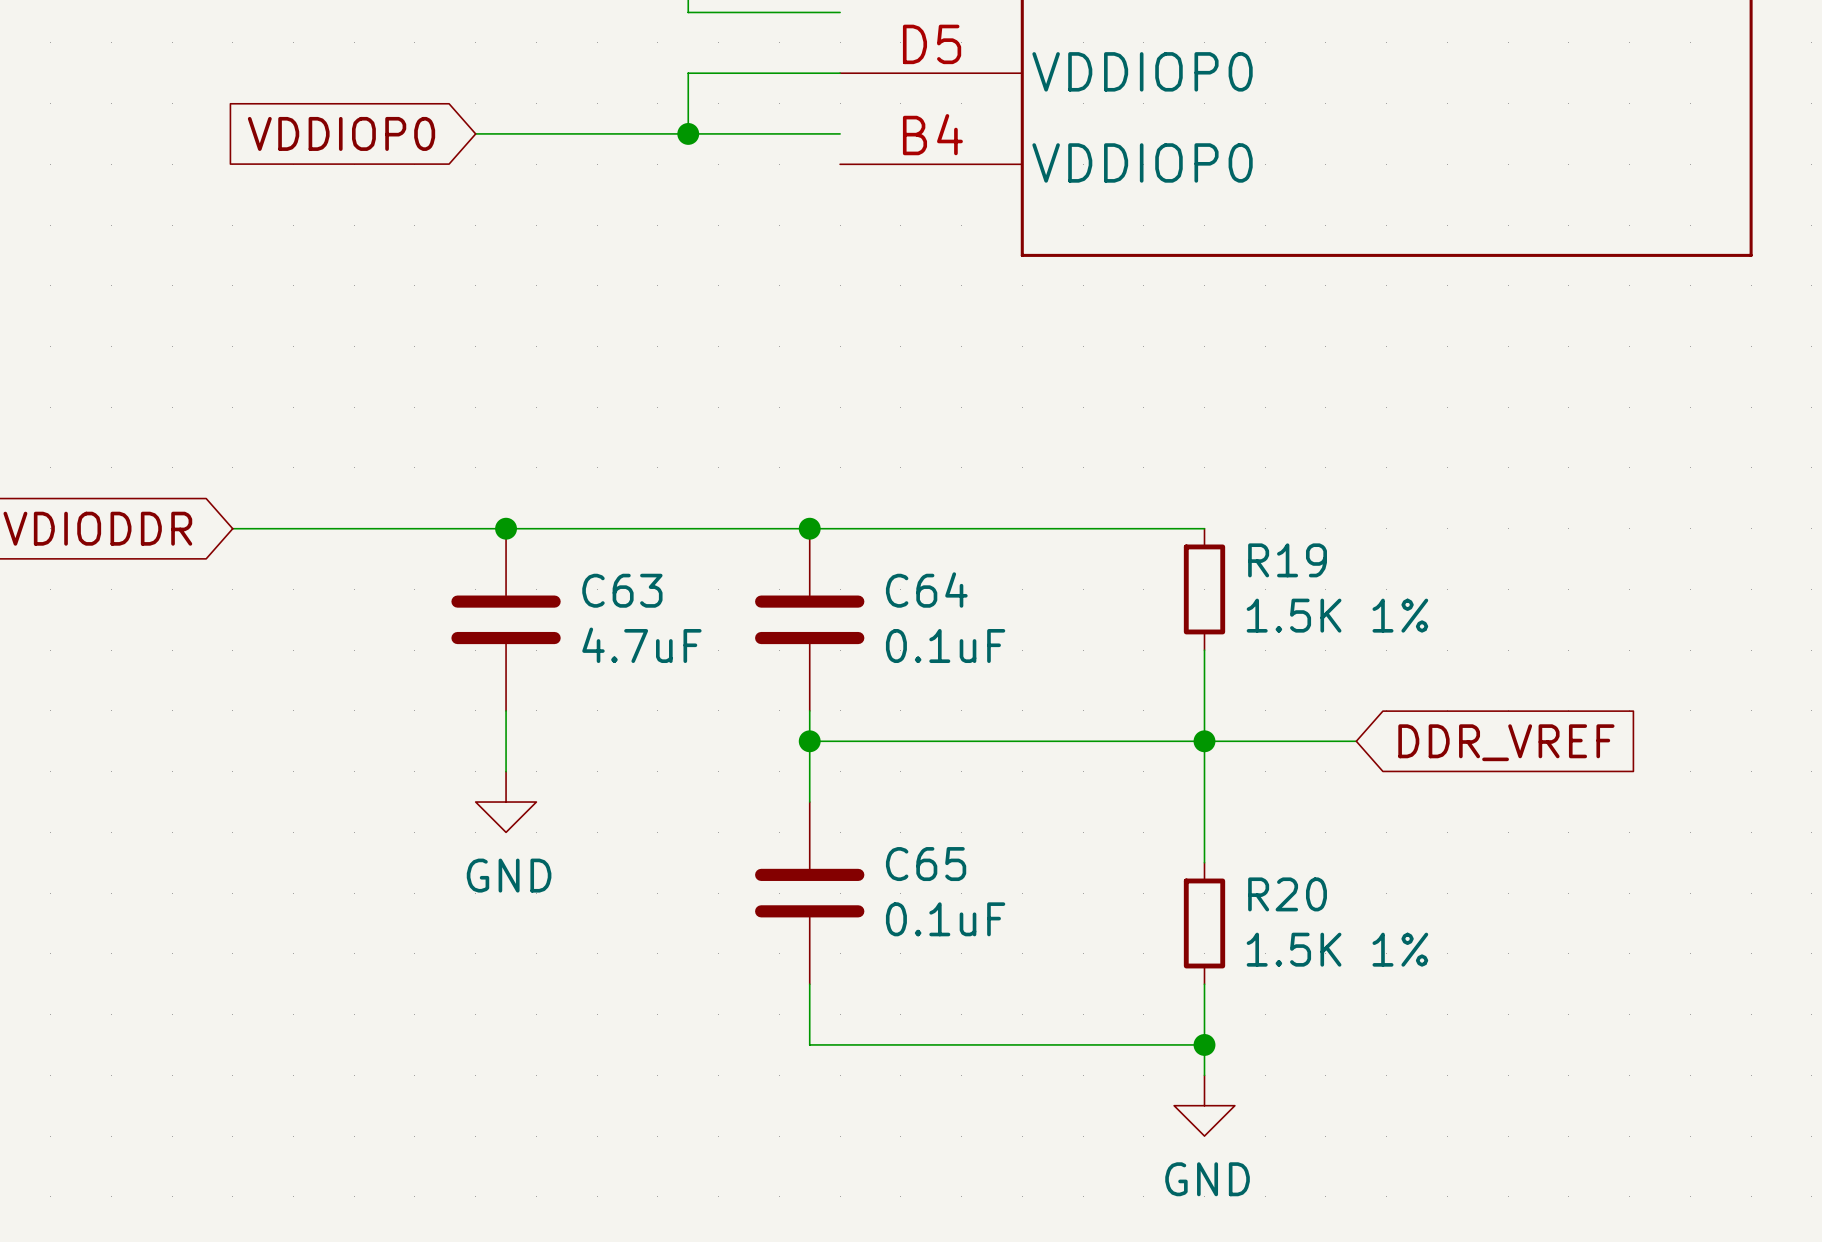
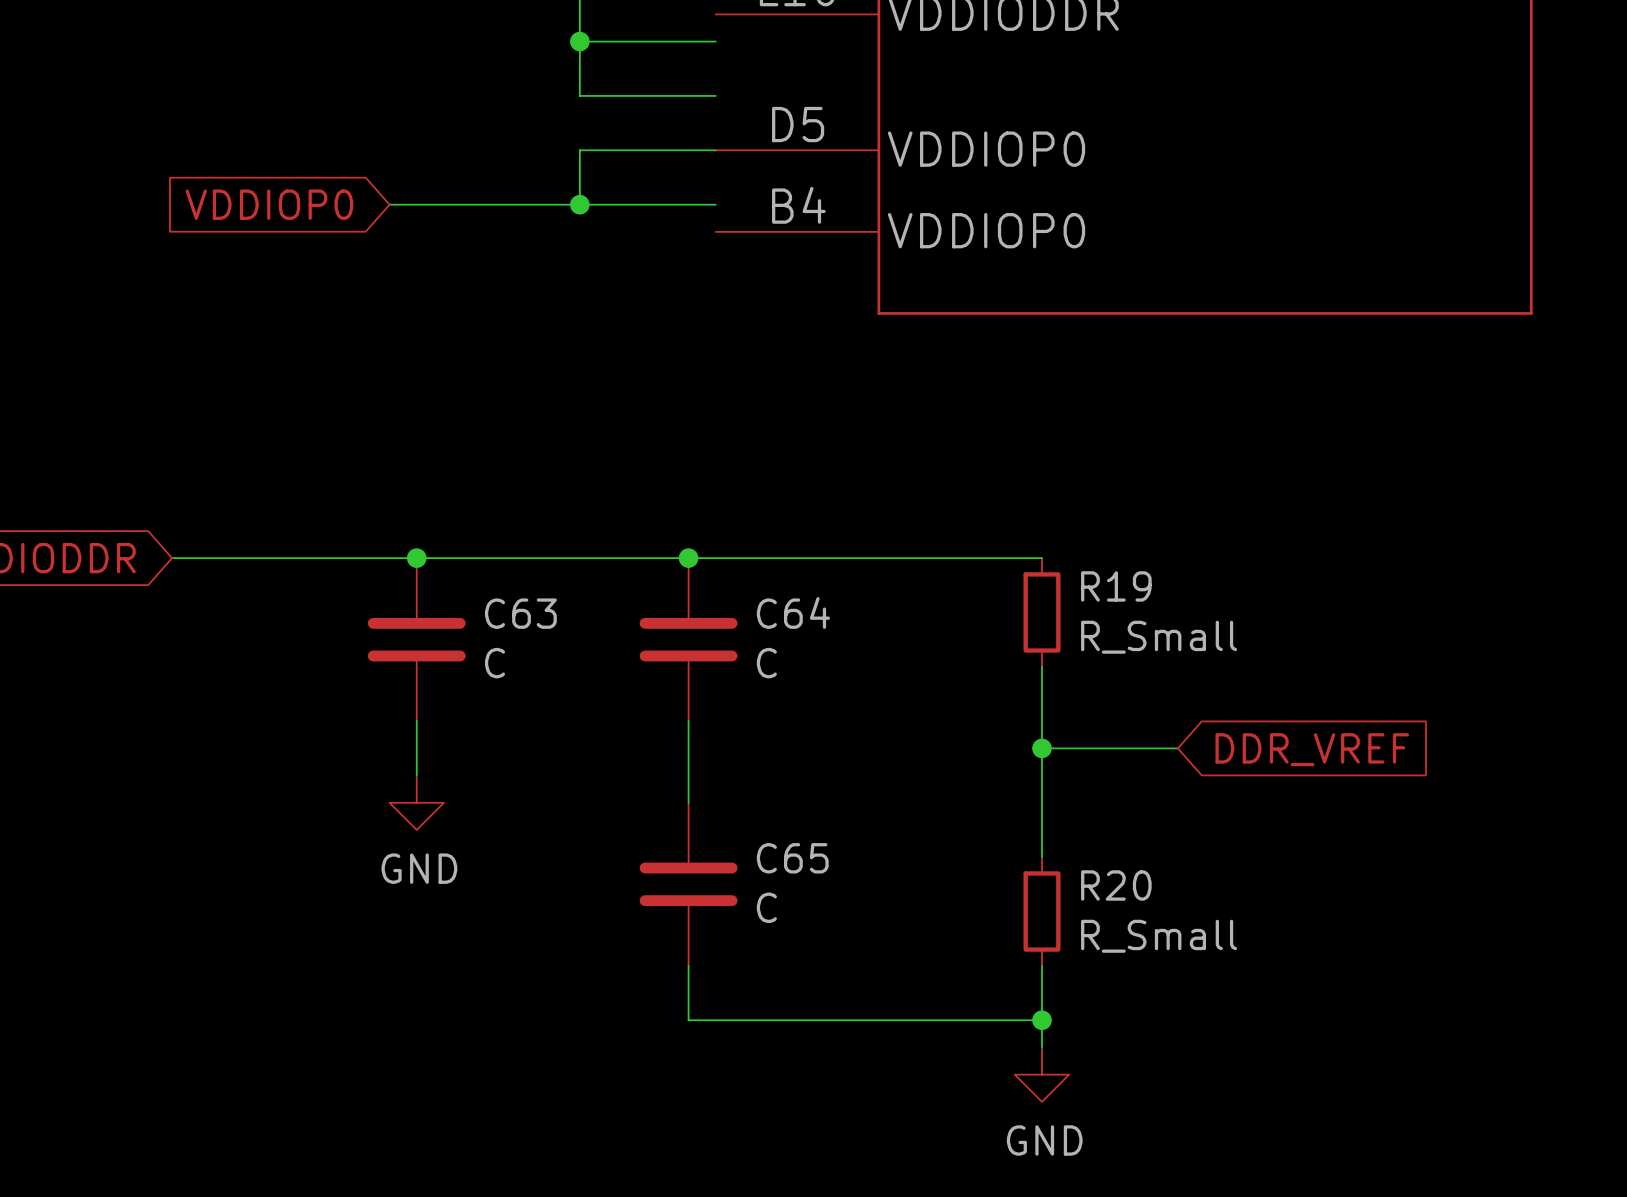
R19 value: 1.5K 1% (1337, 615) -> R_Small (1159, 637)
C63 value: 4.7uF (641, 645) -> C (494, 663)
C64 value: 0.1uF (945, 646) -> C (766, 663)
wire: (809, 741) (1204, 741) -> none
junction: (809, 741) -> none
C65 value: 0.1uF (945, 919) -> C (766, 907)
R20 value: 1.5K 1% (1337, 949) -> R_Small (1159, 936)

